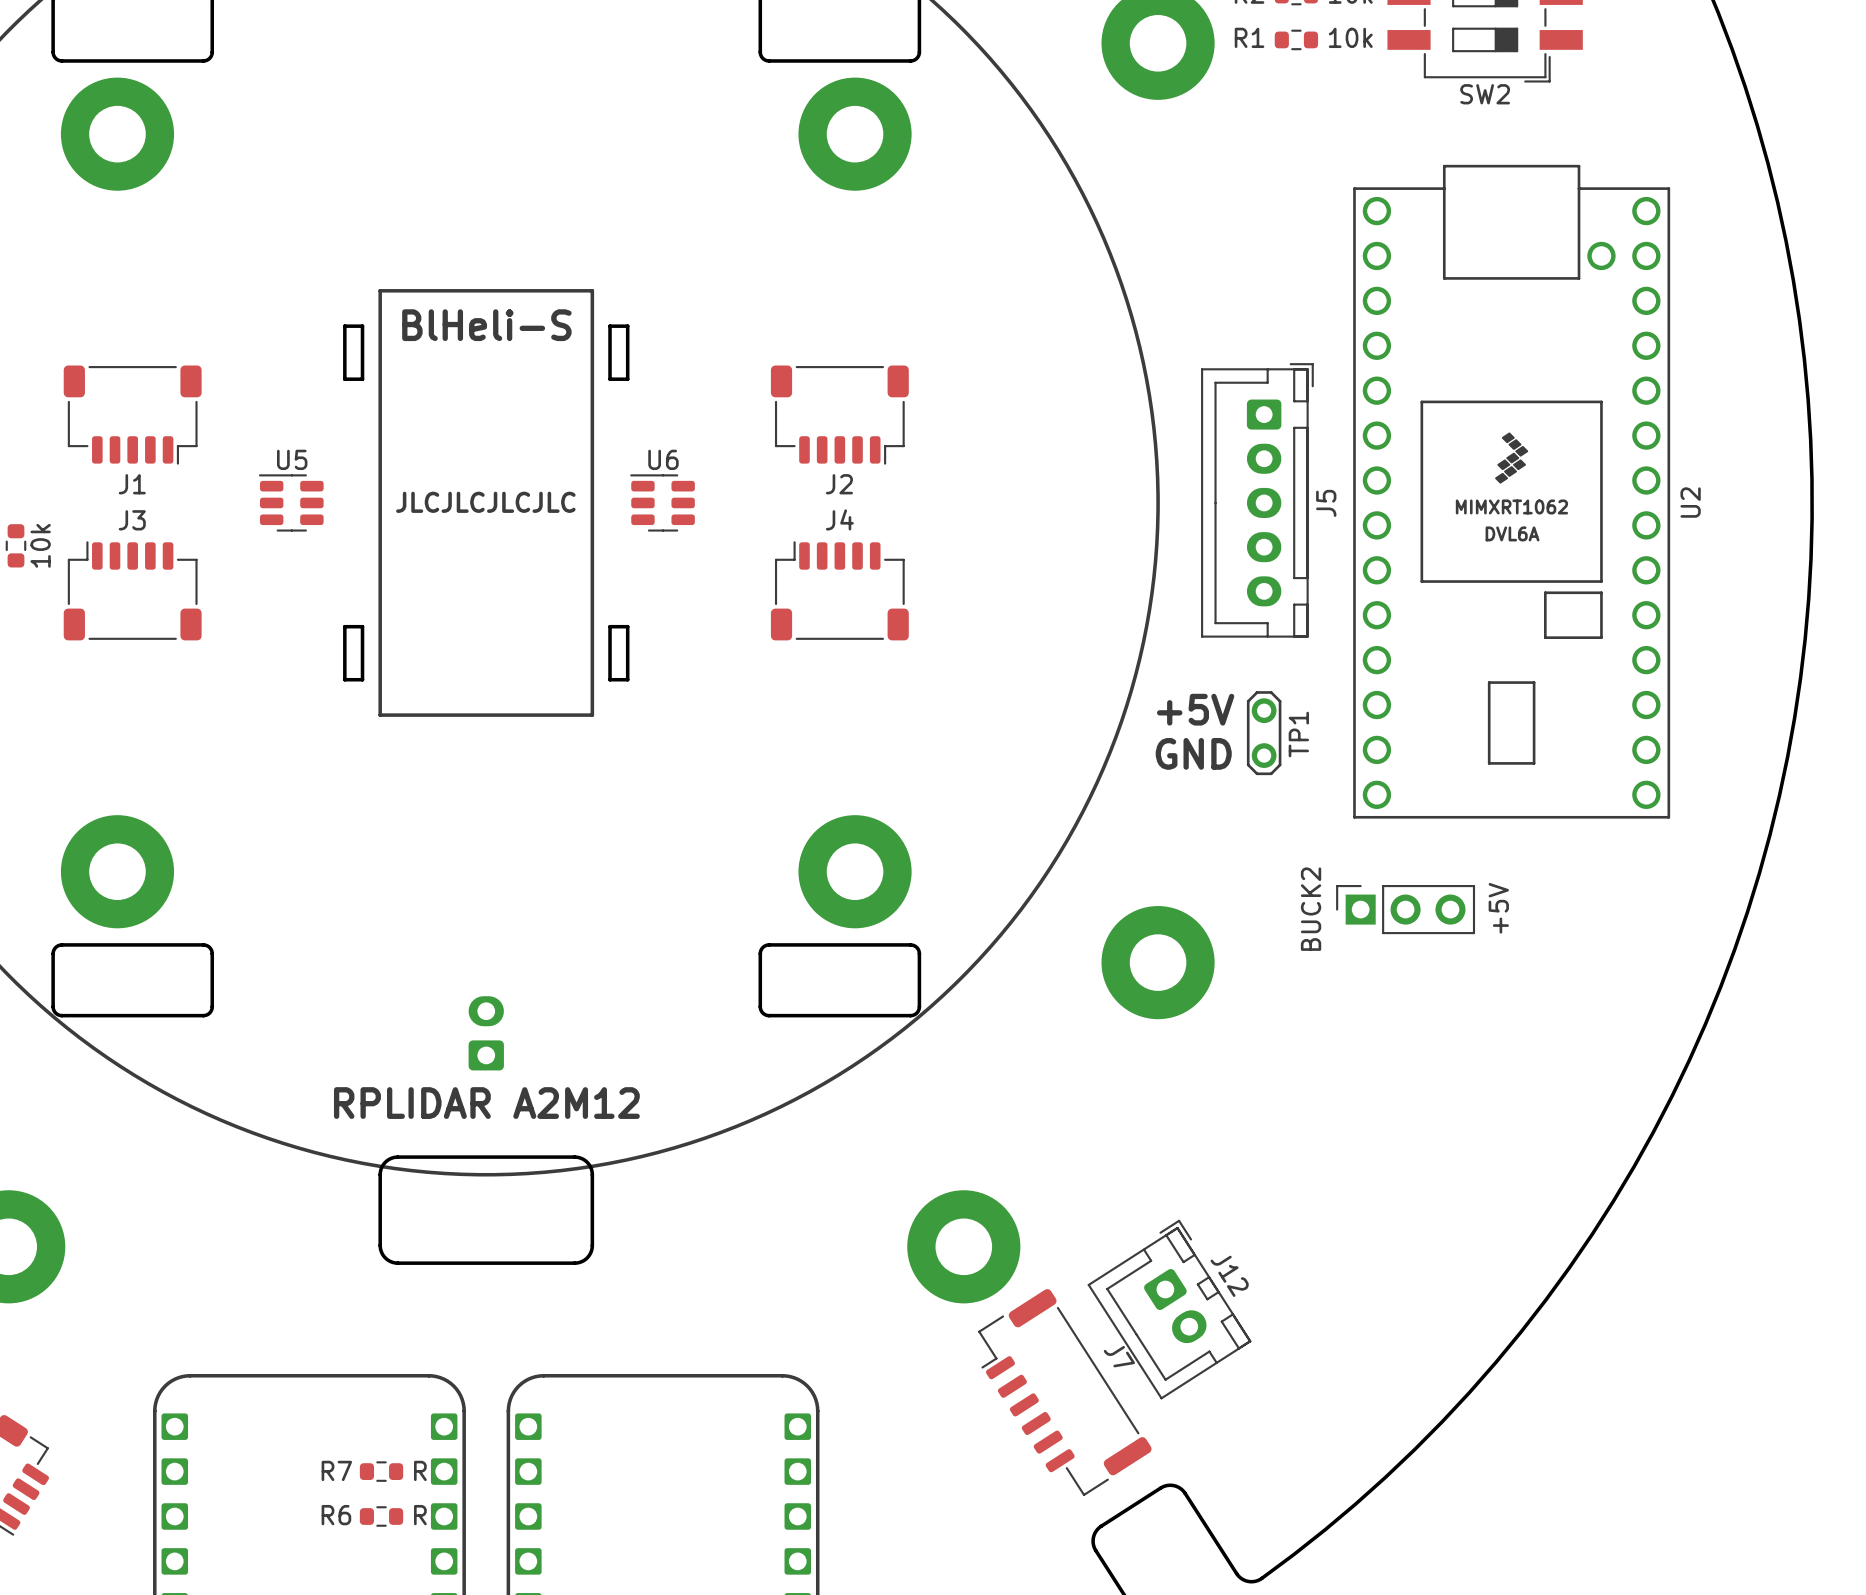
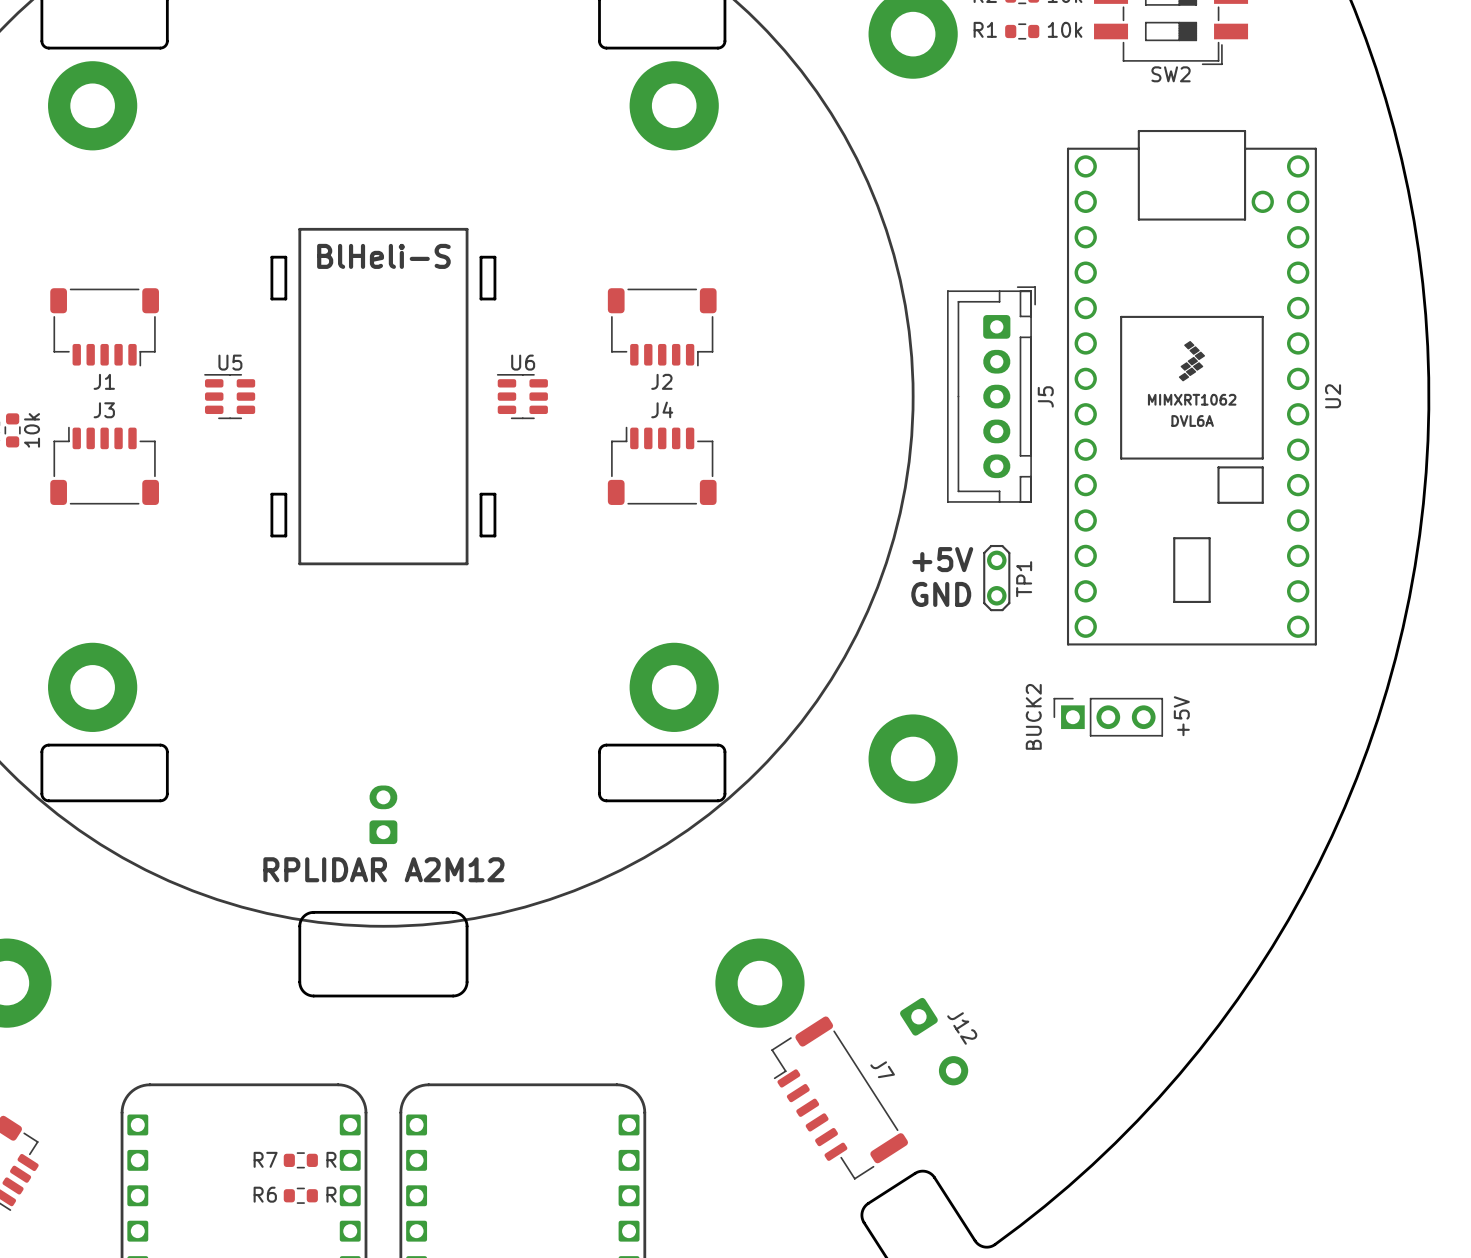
text: JLCJLCJLCJLC (485, 502) -> none
J12 footprint: [1087, 1219, 1252, 1400] -> [900, 997, 969, 1086]

